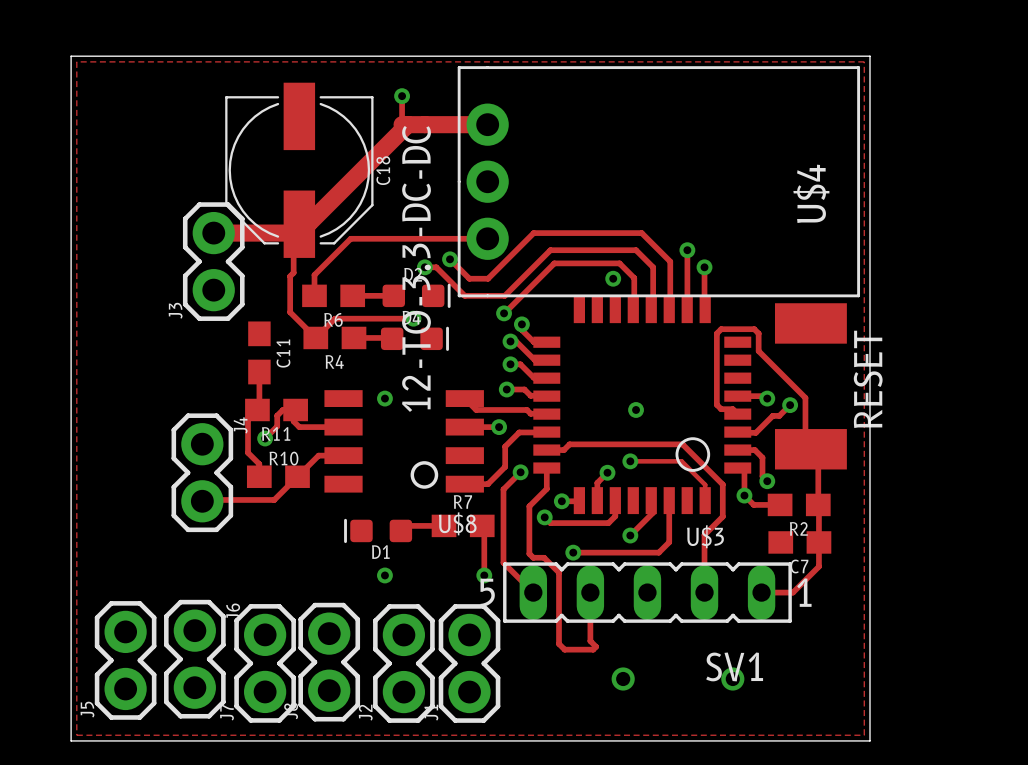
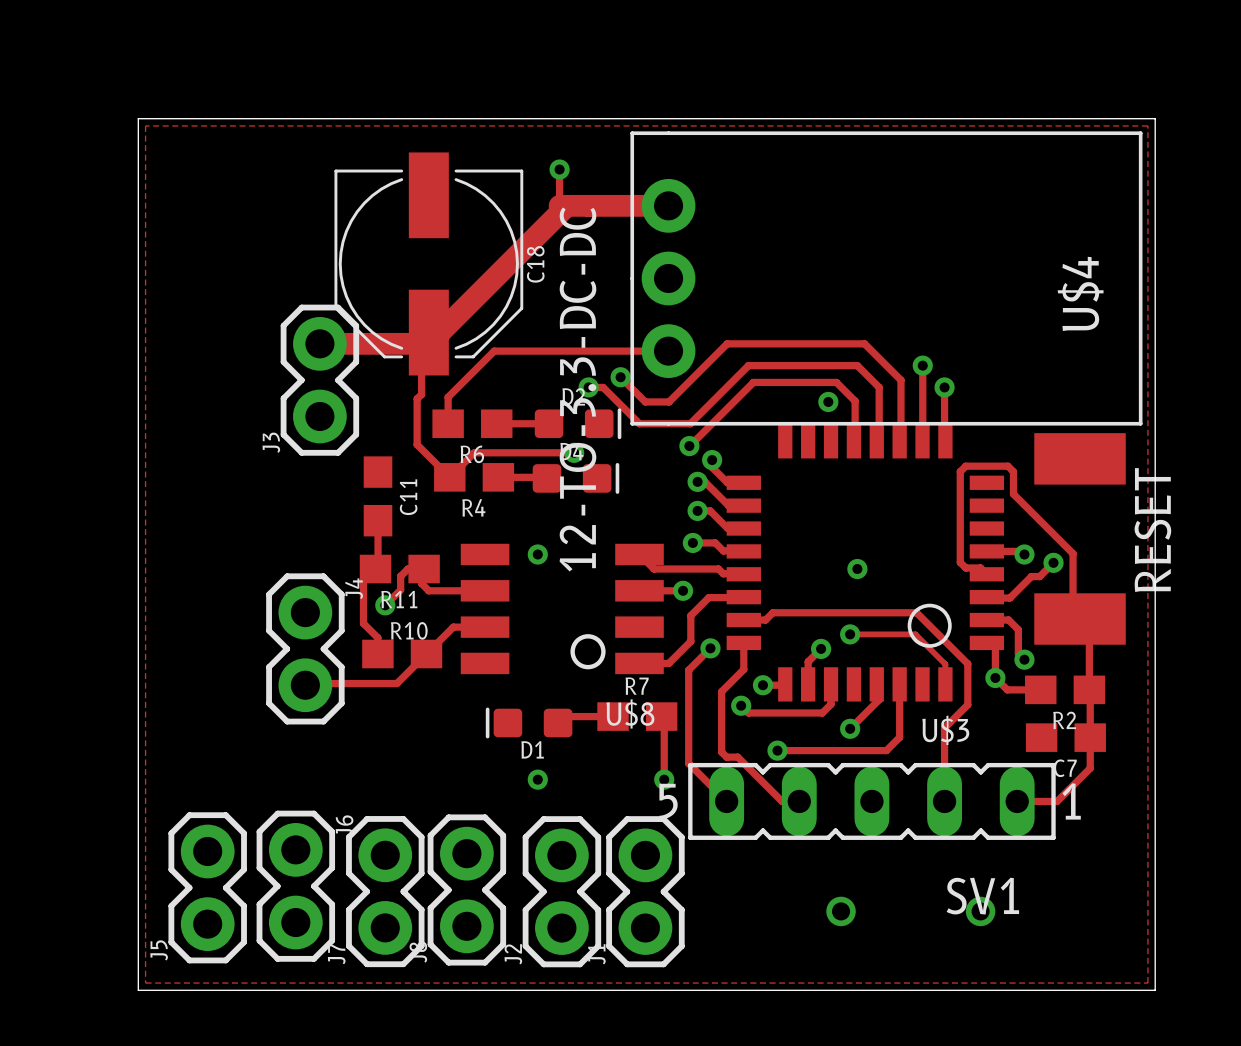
track: (542, 557) (559, 572) (559, 643) (564, 649) (593, 649) (596, 646) (590, 641) (590, 592) -> (737, 757) (782, 801) (799, 801)

